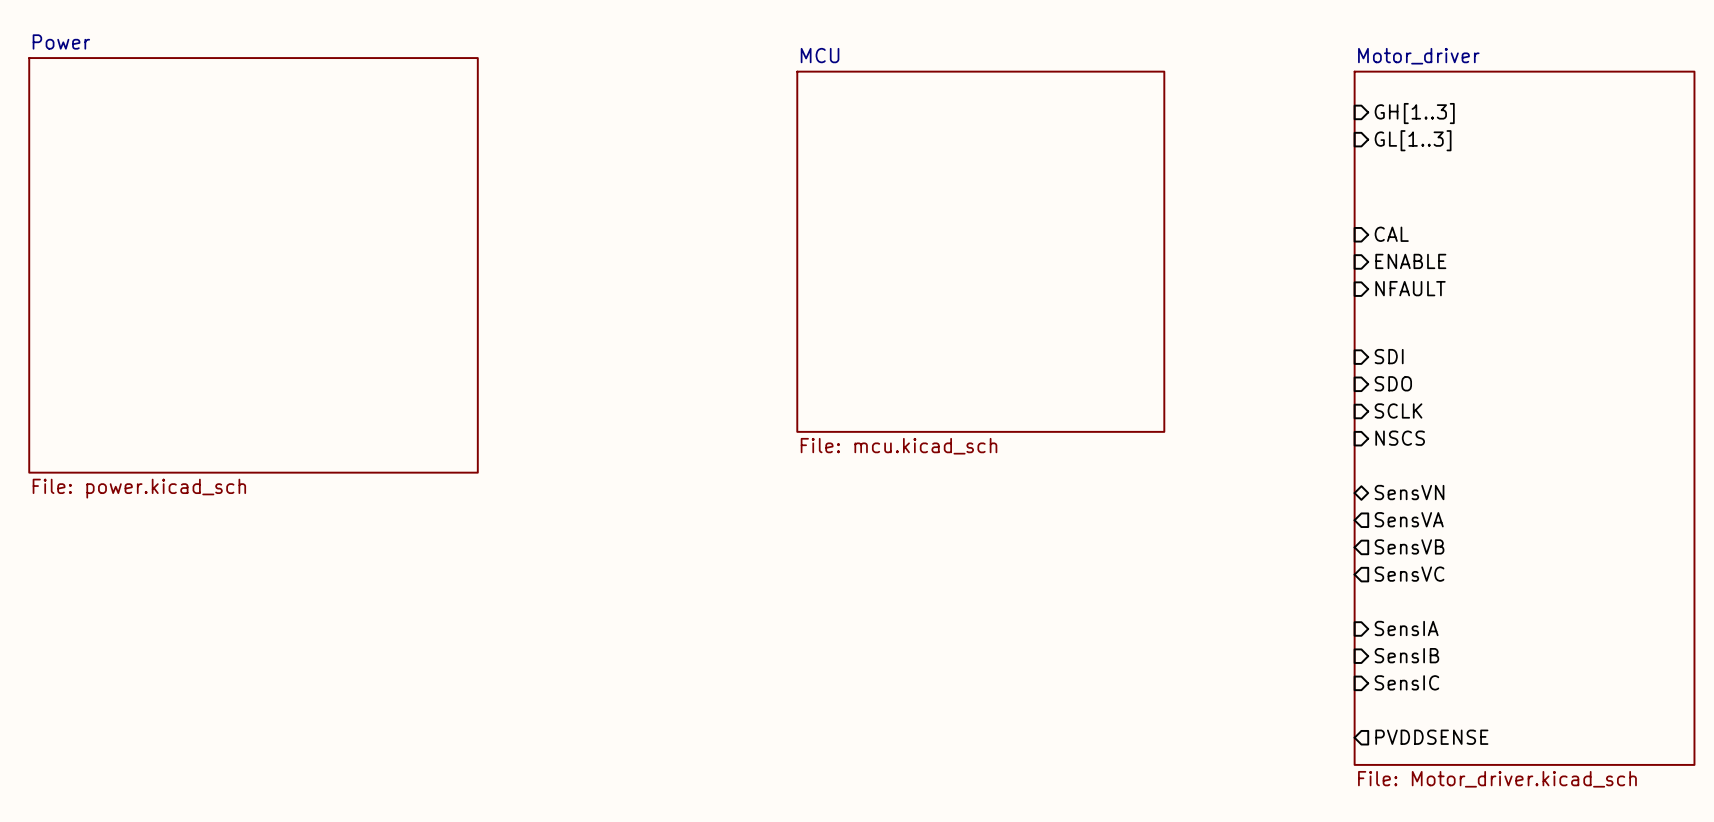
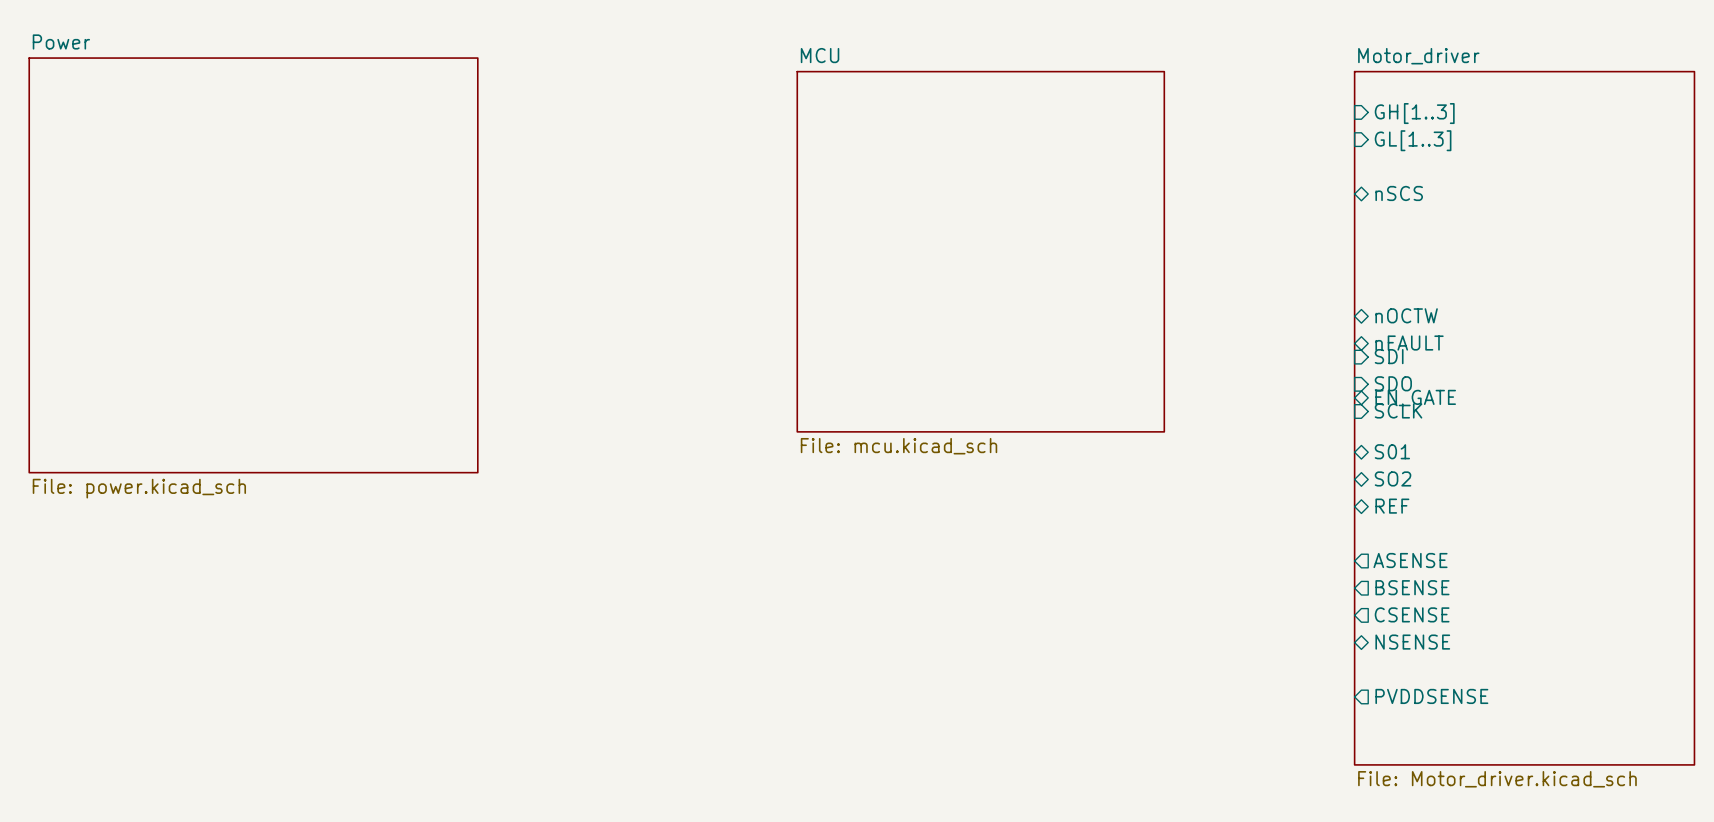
sheet pin: none -> nSCS (1399, 193)
sheet pin: CAL (1391, 234) -> none
sheet pin: ENABLE (1410, 261) -> none
sheet pin: NFAULT (1410, 288) -> none
sheet pin: none -> nOCTW (1406, 315)
sheet pin: none -> nFAULT (1409, 343)
sheet pin: none -> EN_GATE (1415, 398)
sheet pin: NSCS (1400, 438) -> none
sheet pin: none -> S01 (1392, 451)
sheet pin: none -> SO2 (1393, 478)
sheet pin: SensVN (1409, 492) -> none
sheet pin: none -> REF (1392, 506)
sheet pin: SensVA (1409, 519) -> none
sheet pin: SensVB (1409, 546) -> none
sheet pin: none -> ASENSE (1410, 560)
sheet pin: SensVC (1409, 574) -> none
sheet pin: none -> BSENSE (1412, 587)
sheet pin: none -> CSENSE (1412, 614)
sheet pin: SensIA (1406, 628) -> none
sheet pin: none -> NSENSE (1412, 642)
sheet pin: SensIB (1406, 655) -> none
sheet pin: SensIC (1406, 682) -> none
sheet pin position: PVDDSENSE (1431, 737) -> PVDDSENSE (1431, 696)

